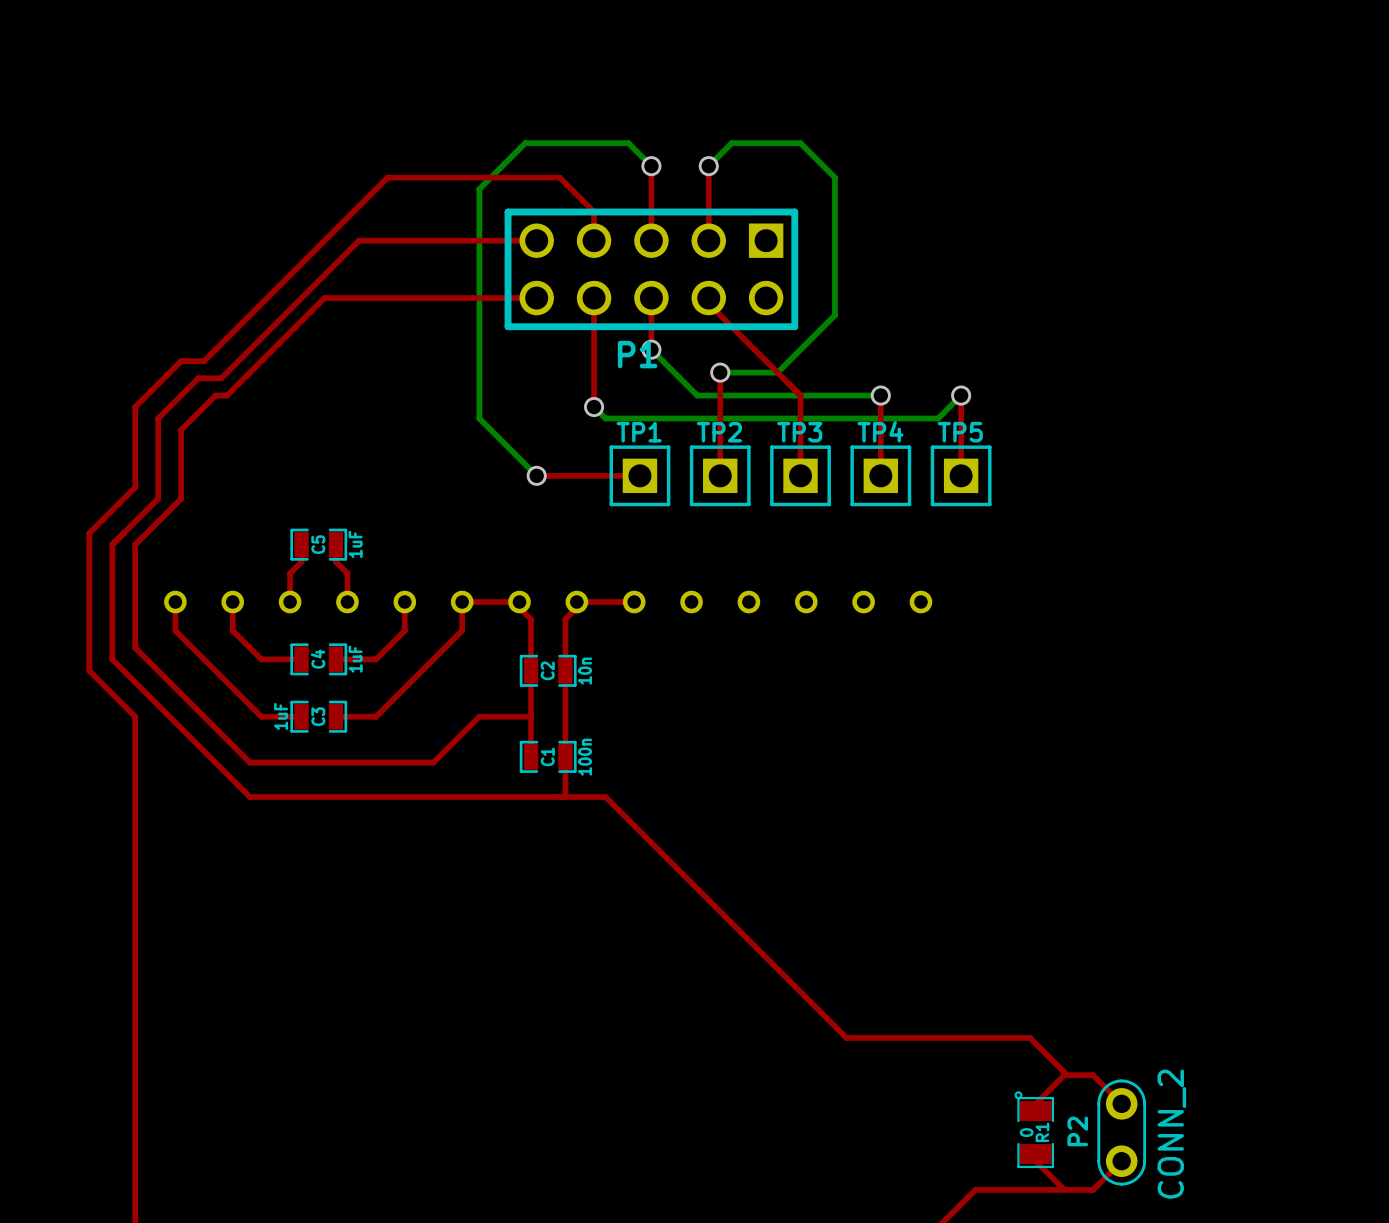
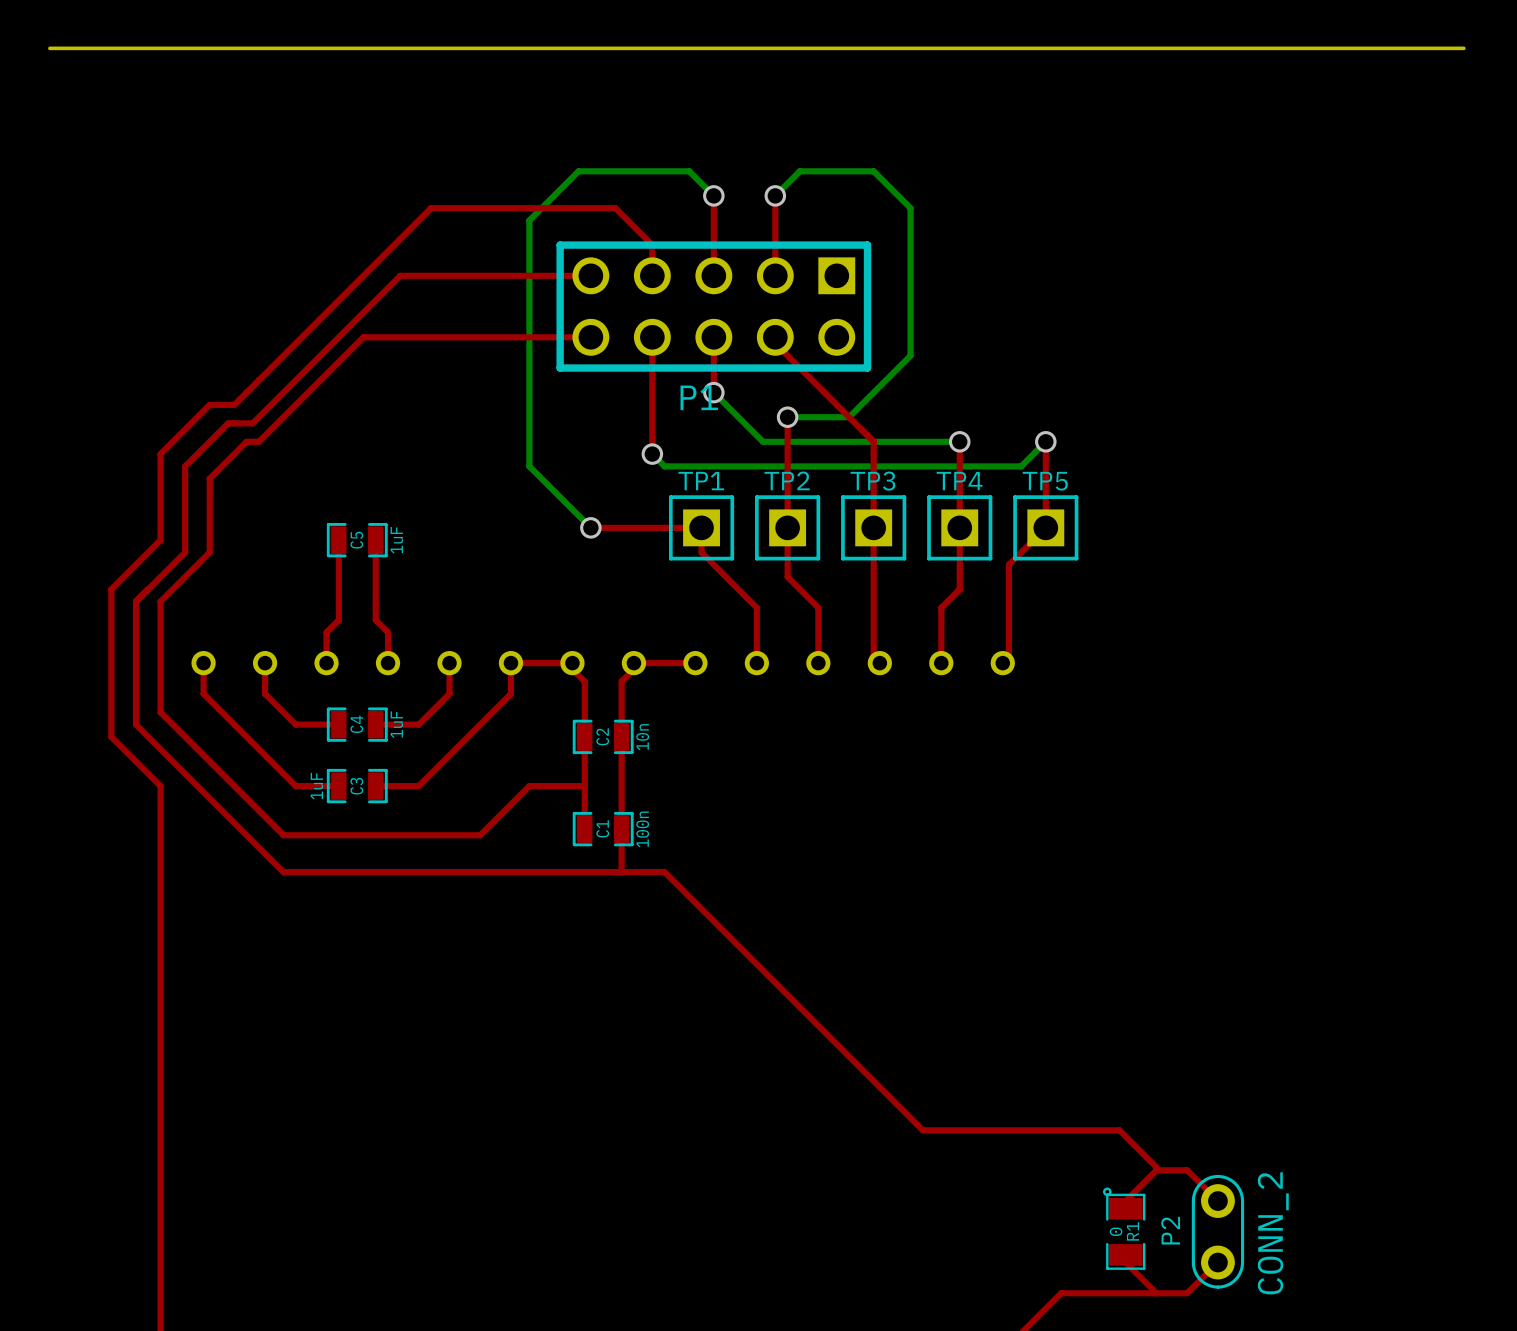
board edge: none -> (49, 48) (1463, 48)
top track: none -> (701, 527) (701, 552) (756, 607) (756, 663)
top track: none -> (787, 527) (787, 577) (818, 607) (818, 663)
top track: none -> (873, 527) (873, 656) (879, 663)
top track: none -> (959, 527) (959, 589) (941, 607) (941, 663)
top track: none -> (1045, 527) (1008, 564) (1008, 656) (1002, 663)
top track: none -> (338, 540) (338, 601)
top track: none -> (375, 540) (375, 601)
C5 position: (318, 544) -> (357, 540)

